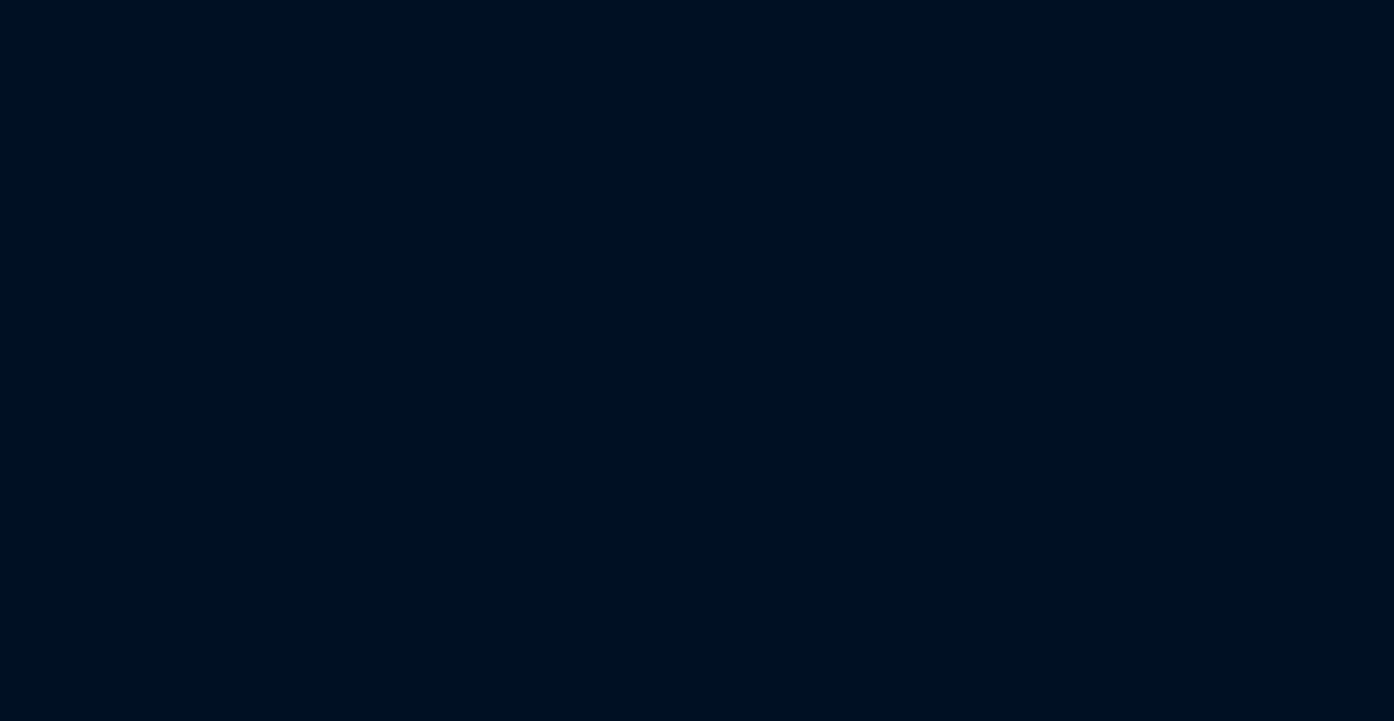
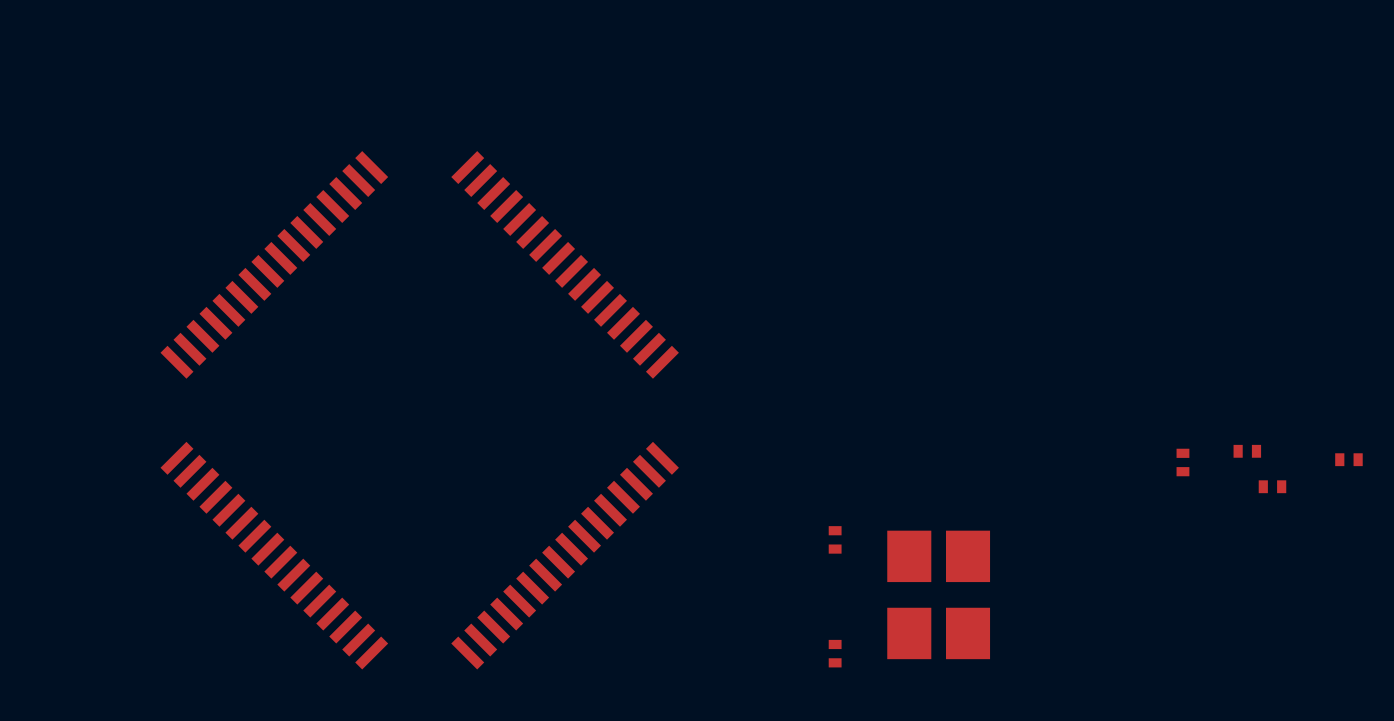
part: none -> (419, 410)
part: none -> (1247, 451)
part: none -> (1348, 459)
part: none -> (1182, 462)
part: none -> (1272, 486)
part: none -> (835, 539)
part: none -> (938, 594)
part: none -> (835, 653)

